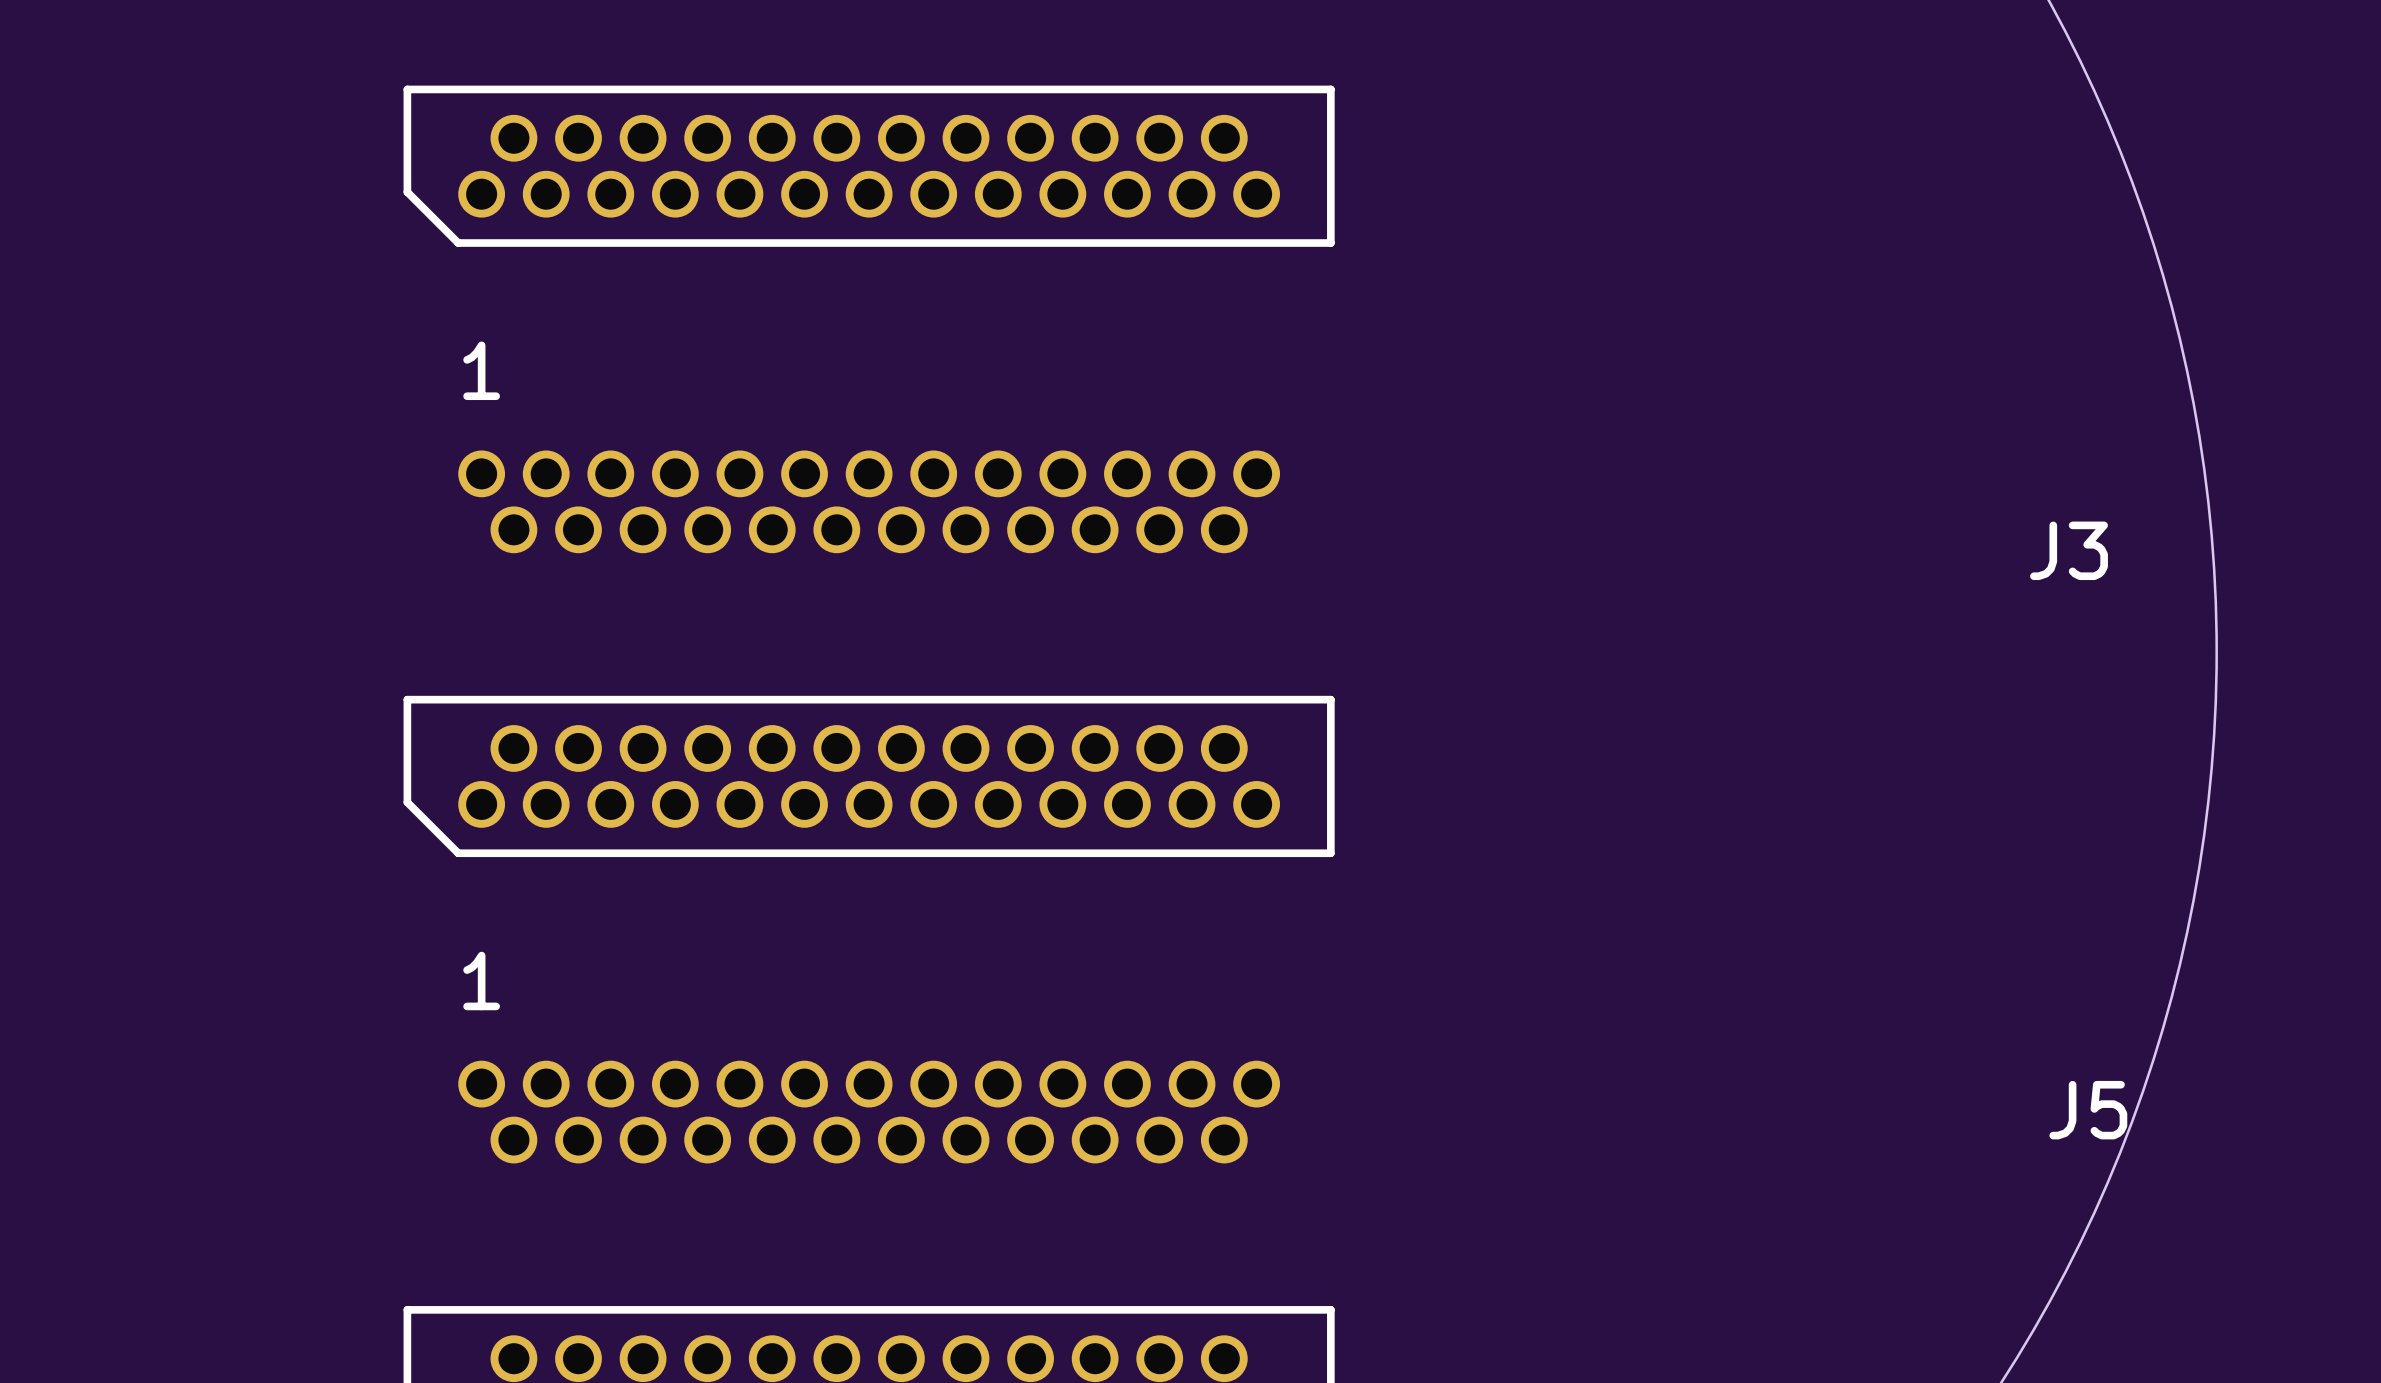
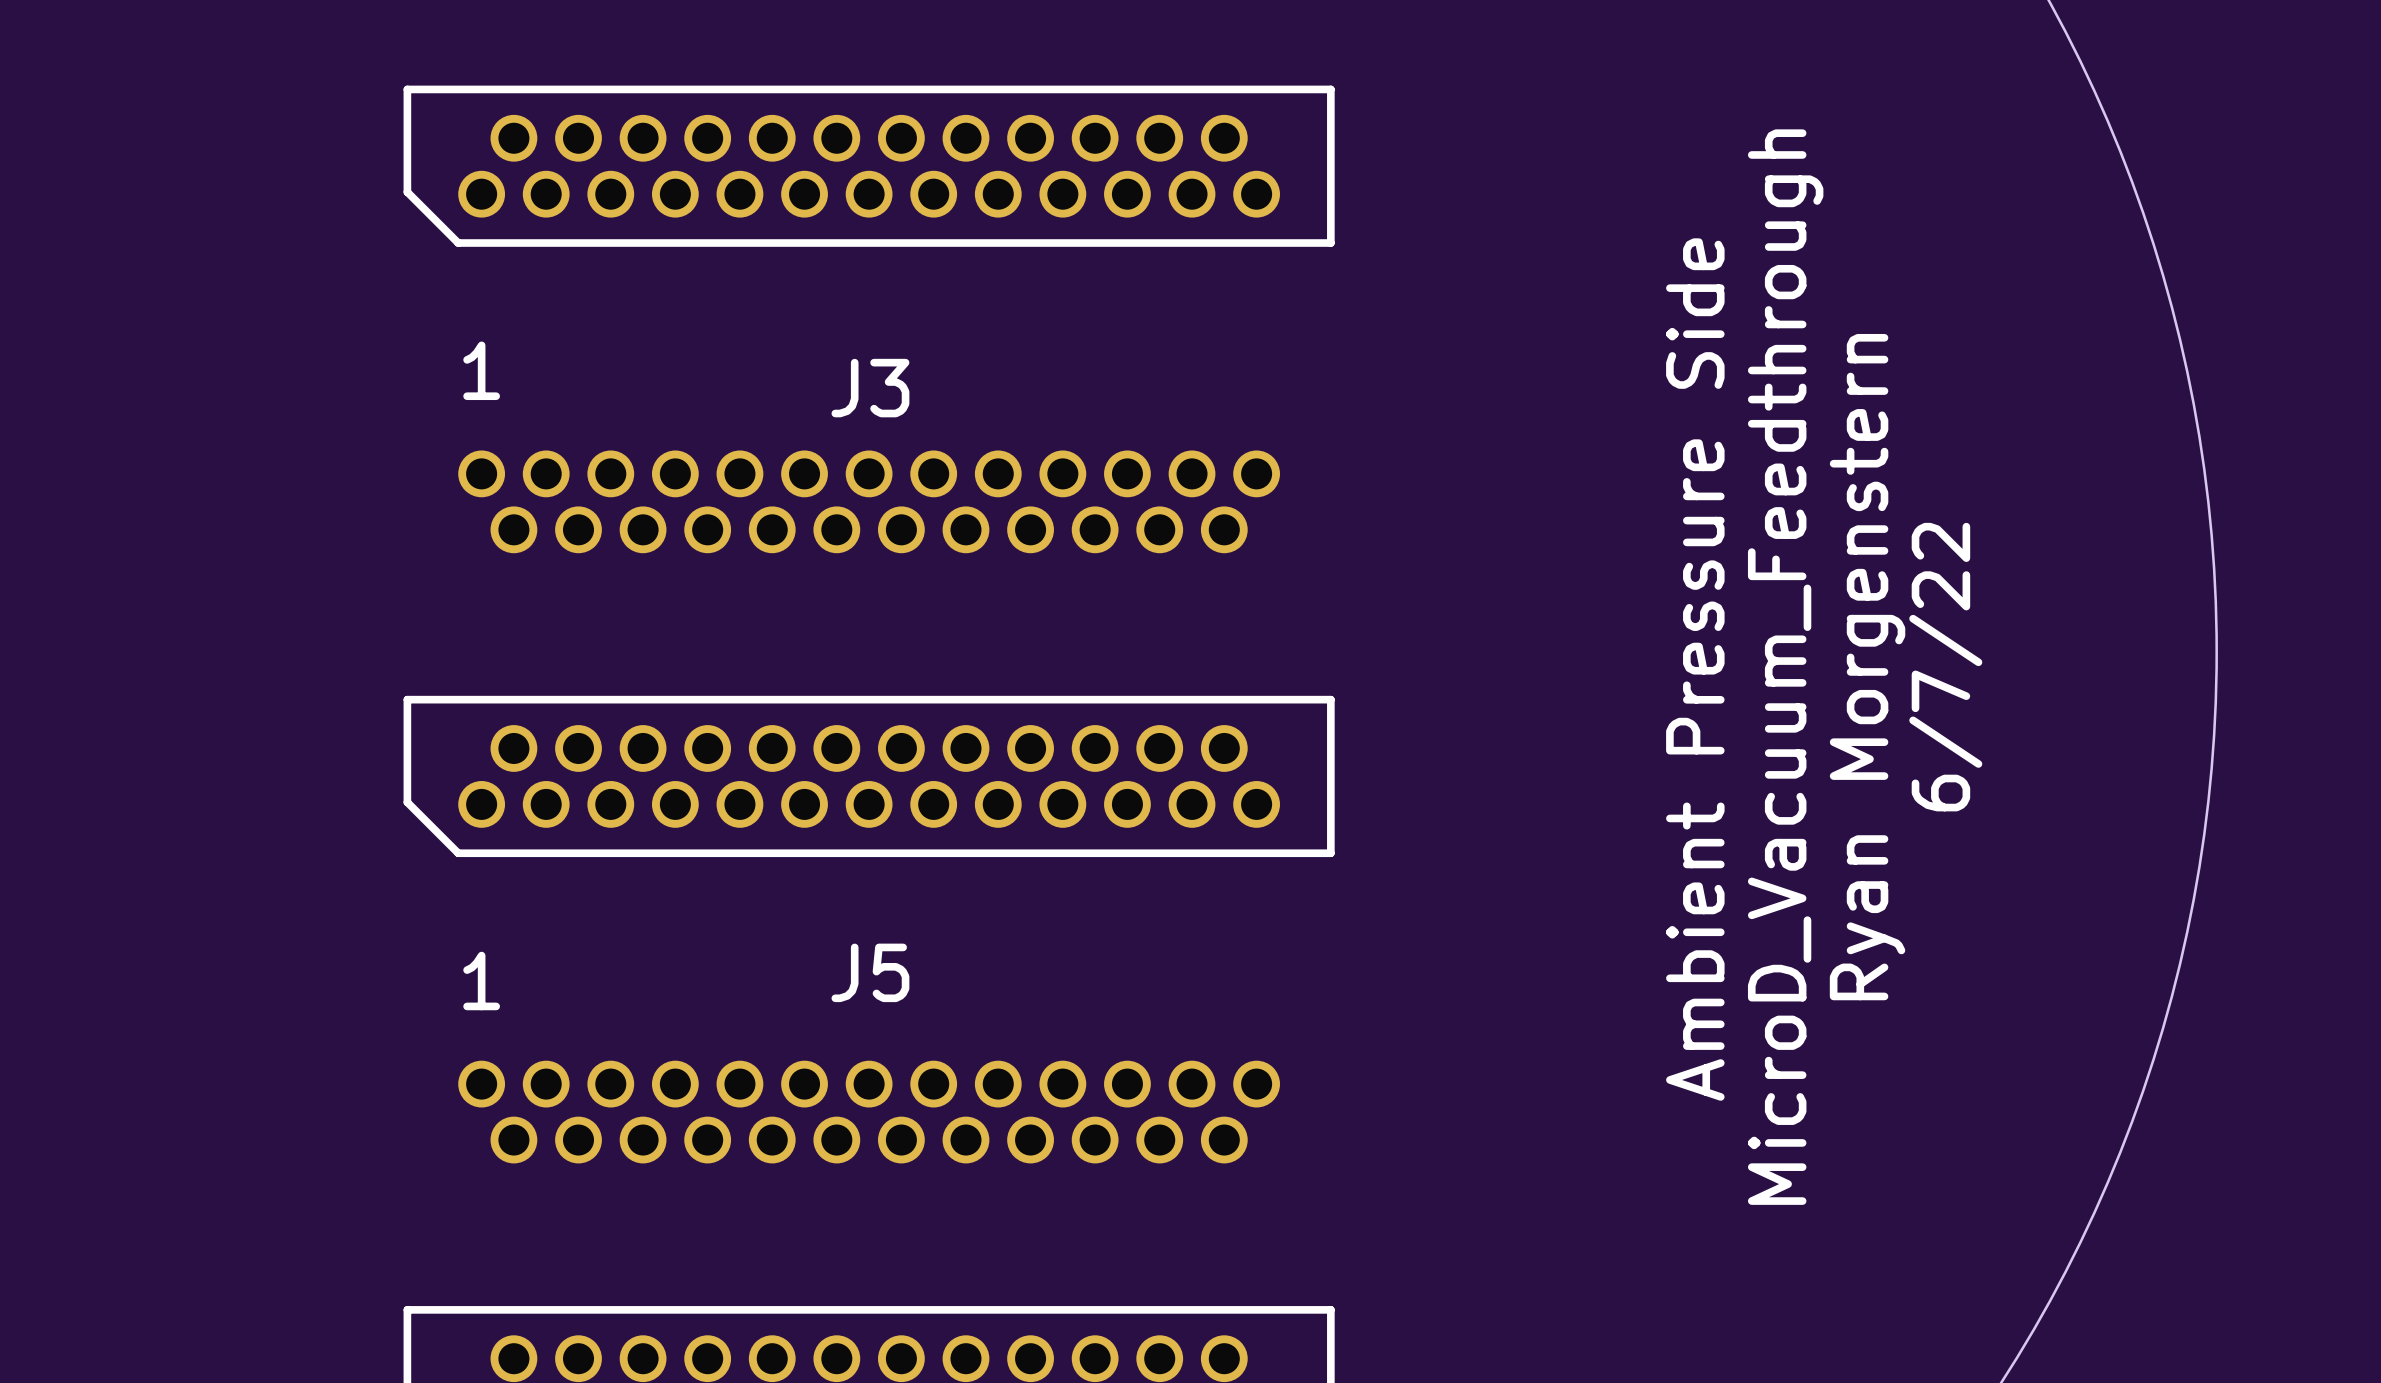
J3 name position: J3 (2069, 550) -> J3 (870, 388)
text: none -> MicroD_Vacuum_Feedthrough (1785, 667)
text: none -> Ryan Morgenstern (1867, 667)
text: none -> 6/7/22 (1945, 667)
text: none -> Ambient Pressure Side (1695, 669)
J5 name position: J5 (2088, 1110) -> J5 (870, 972)

